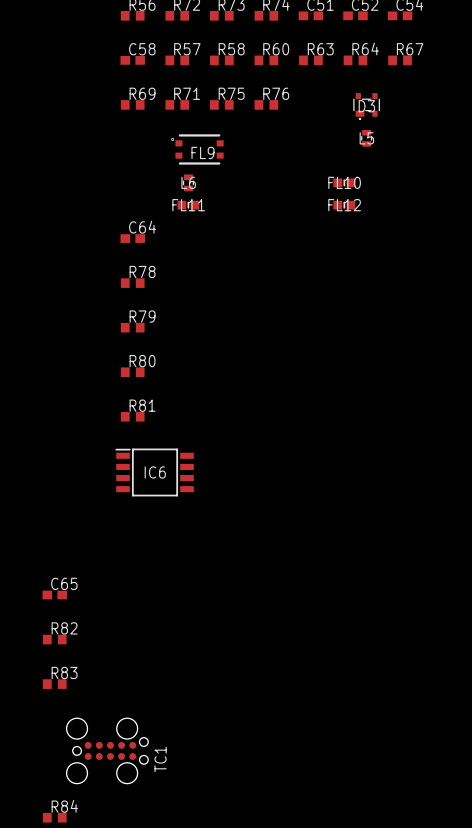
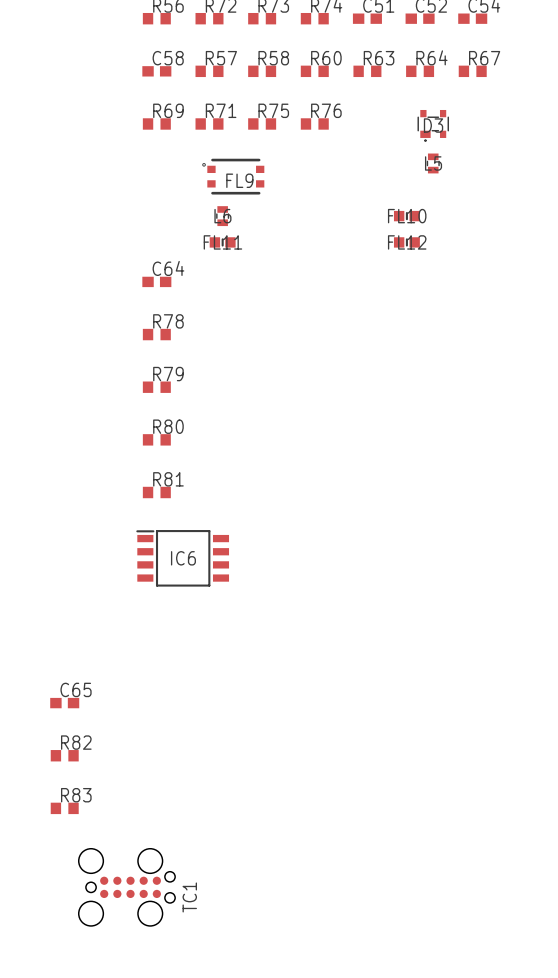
R84: (54, 817) -> none

